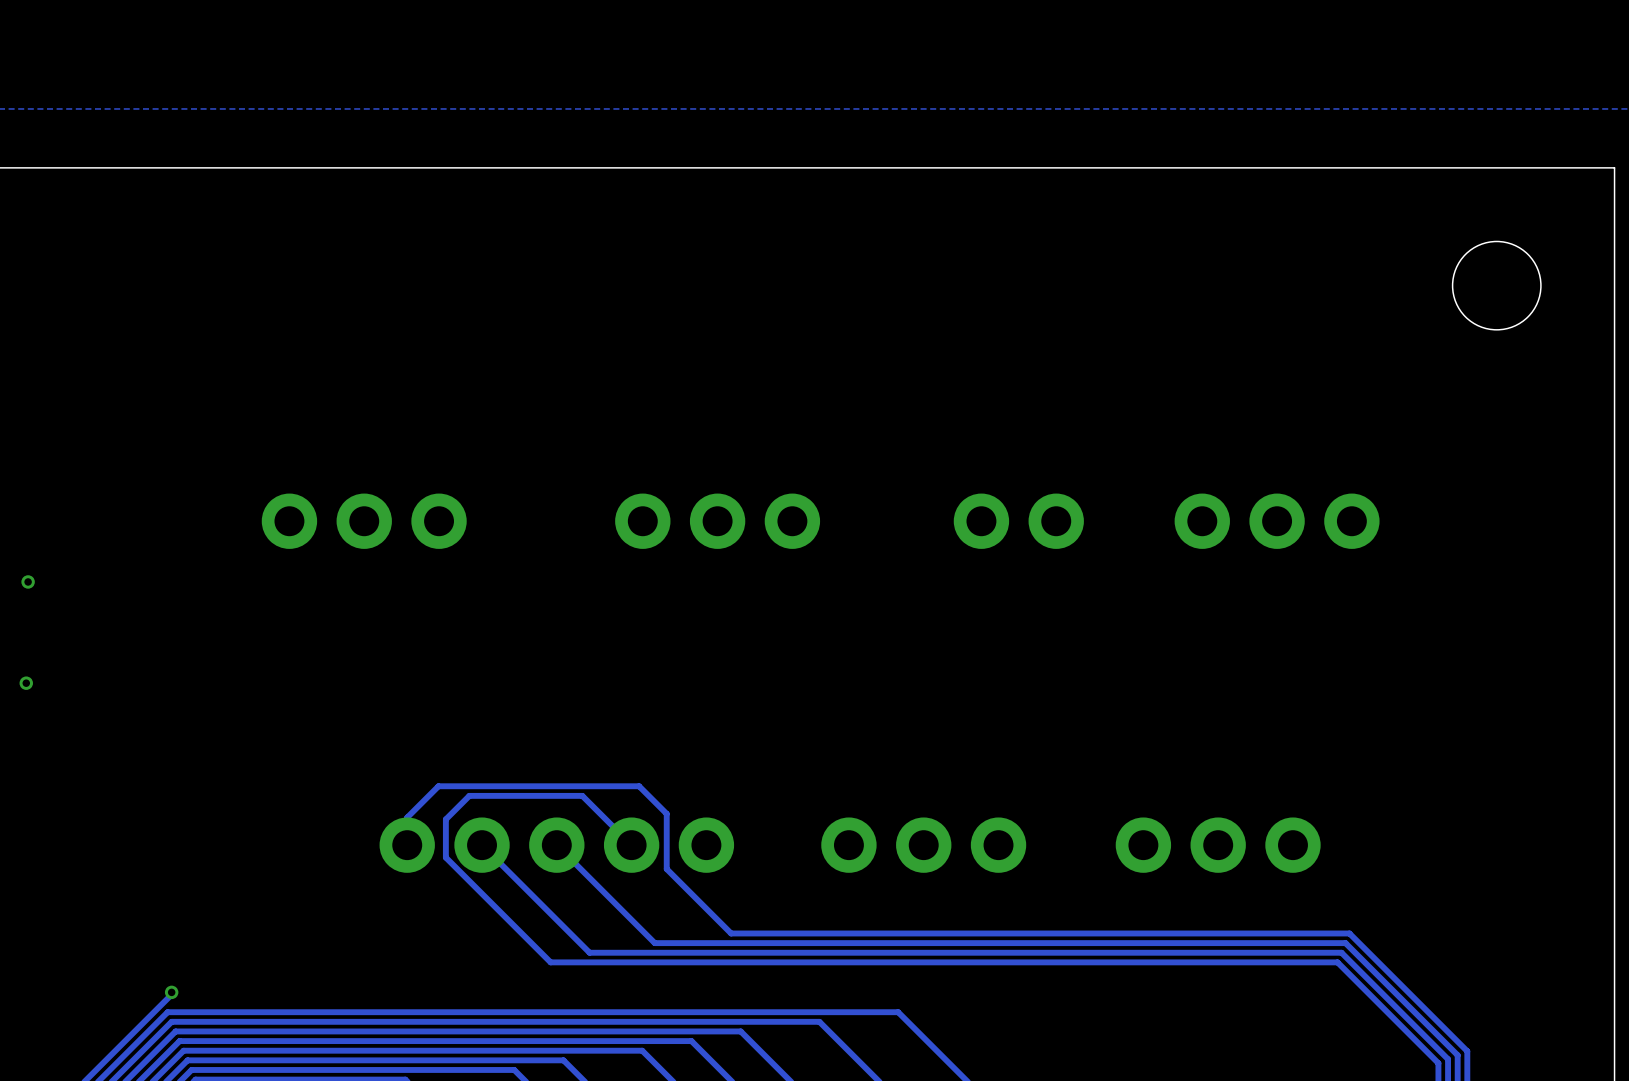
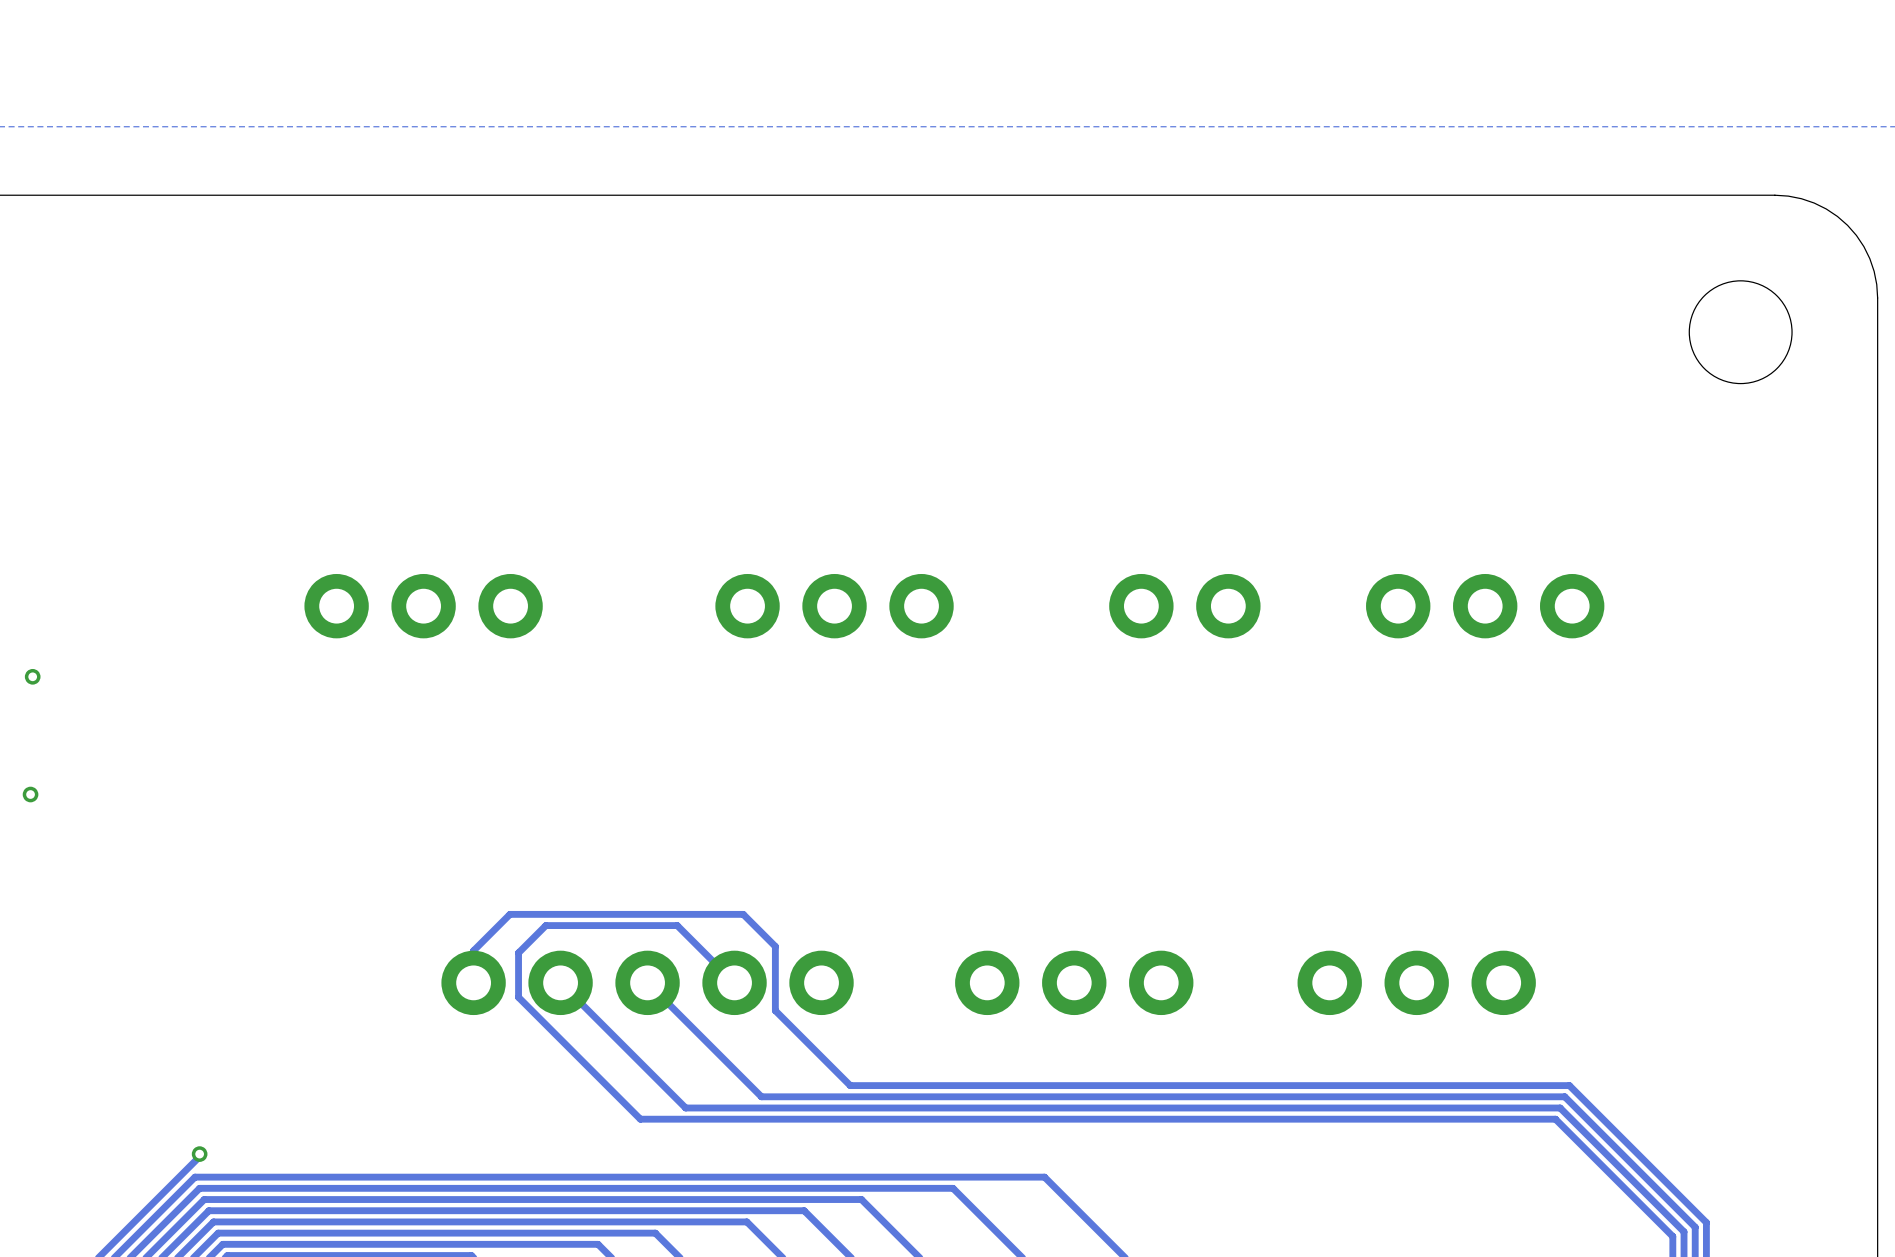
board edge: (1526, 167) (1614, 167) (1614, 256) -> (1774, 195) (1801, 198) (1814, 203) (1837, 216) (1847, 225) (1856, 235) (1869, 258) (1874, 271) (1877, 297)

